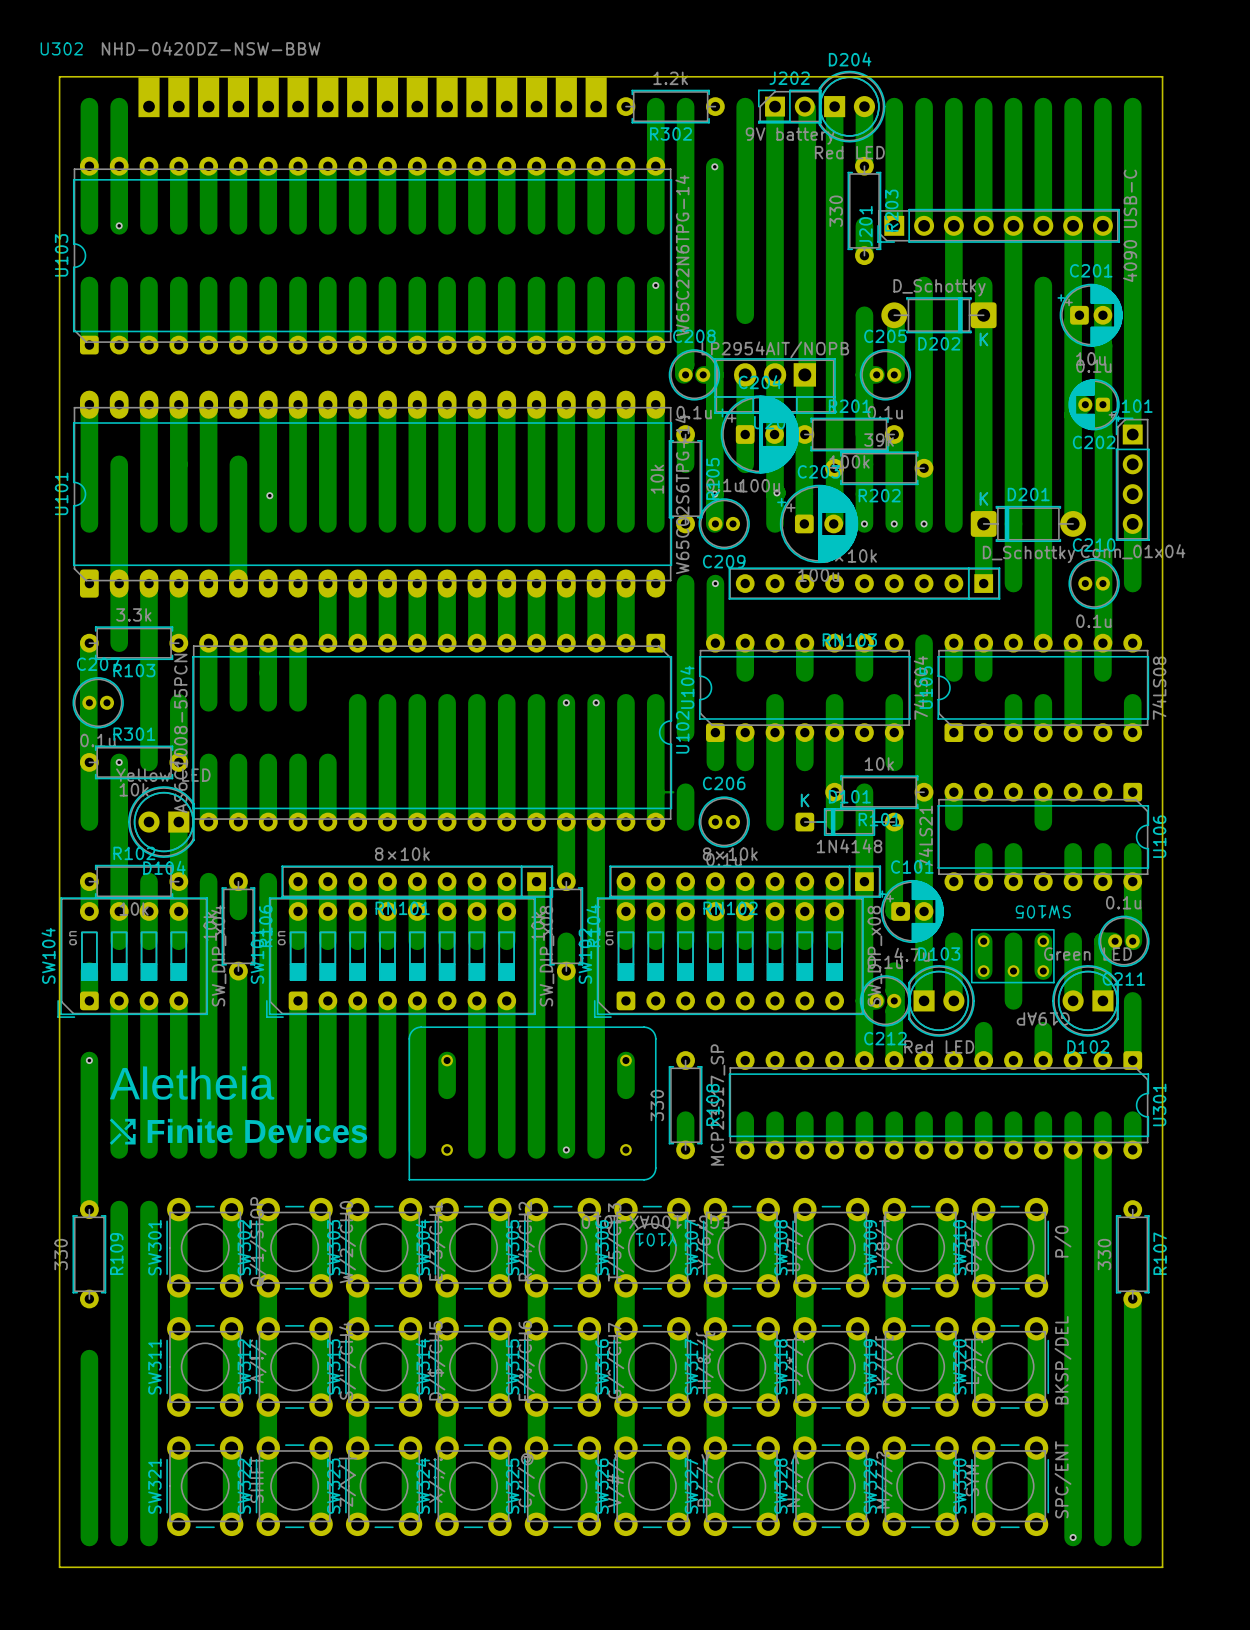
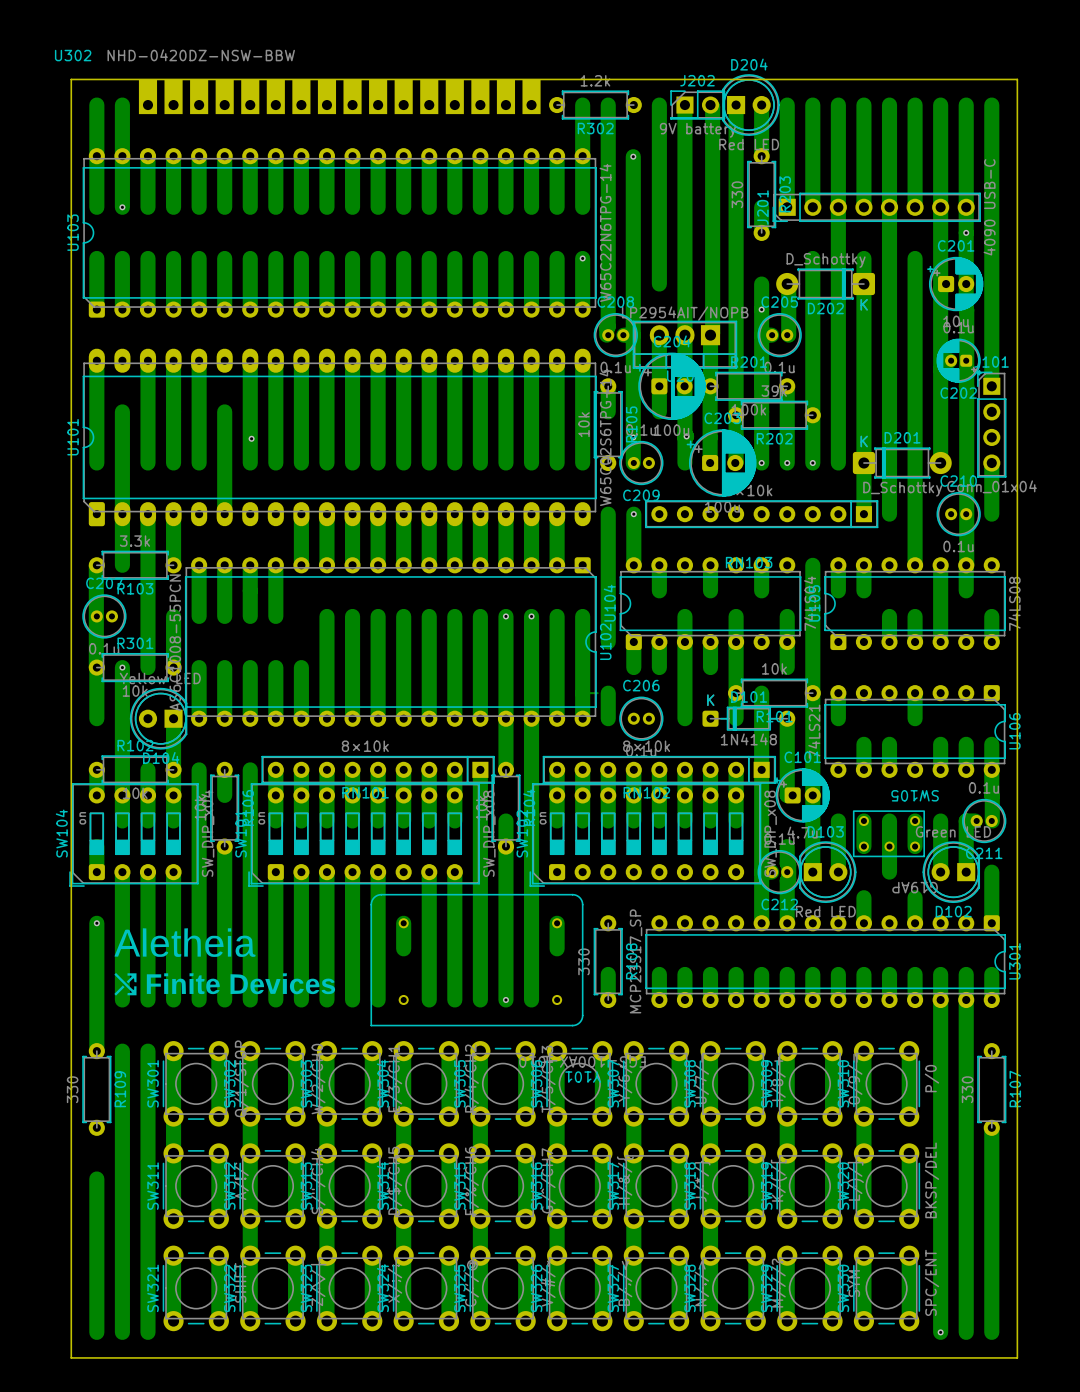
via: none -> (966, 232)
via: none -> (761, 309)

